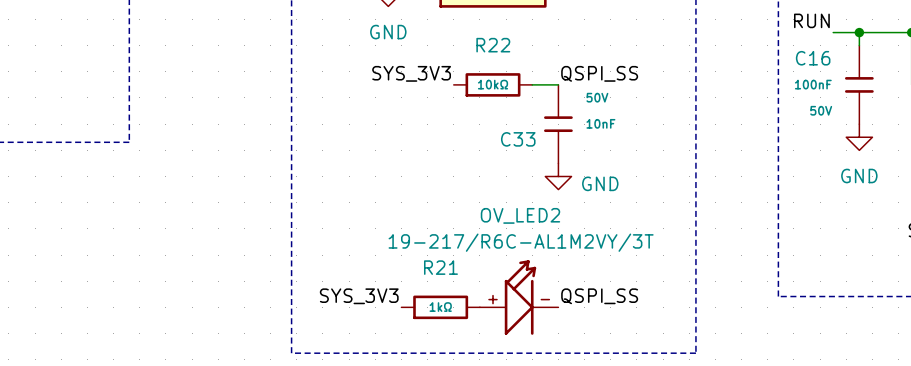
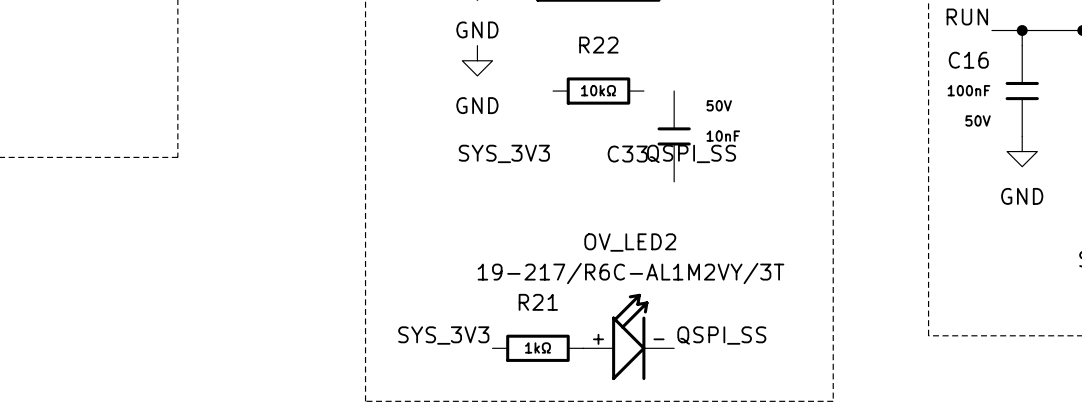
power symbol: none -> GND (477, 60)
label position: SYS_3V3 (411, 73) -> SYS_3V3 (504, 153)
label position: QSPI_SS (599, 73) -> QSPI_SS (691, 153)
wire: (532, 84) (558, 84) -> none
power symbol: GND (558, 176) -> none

